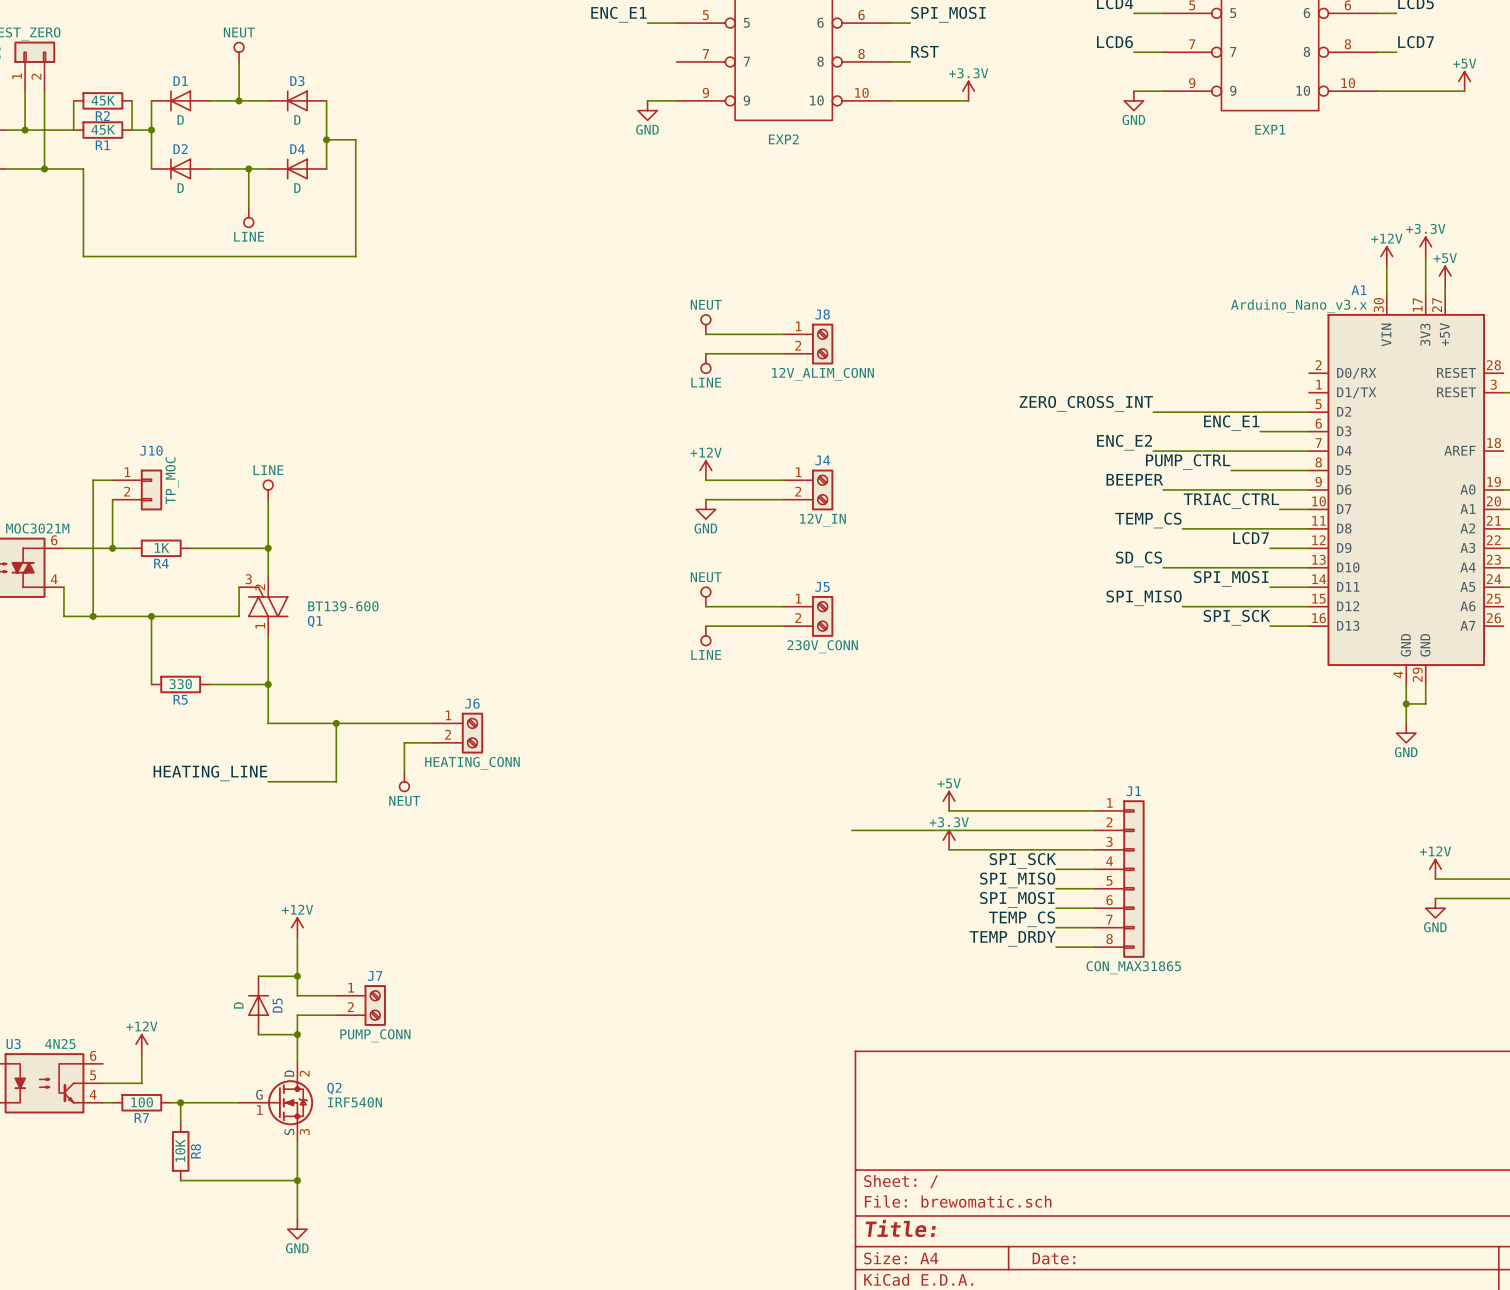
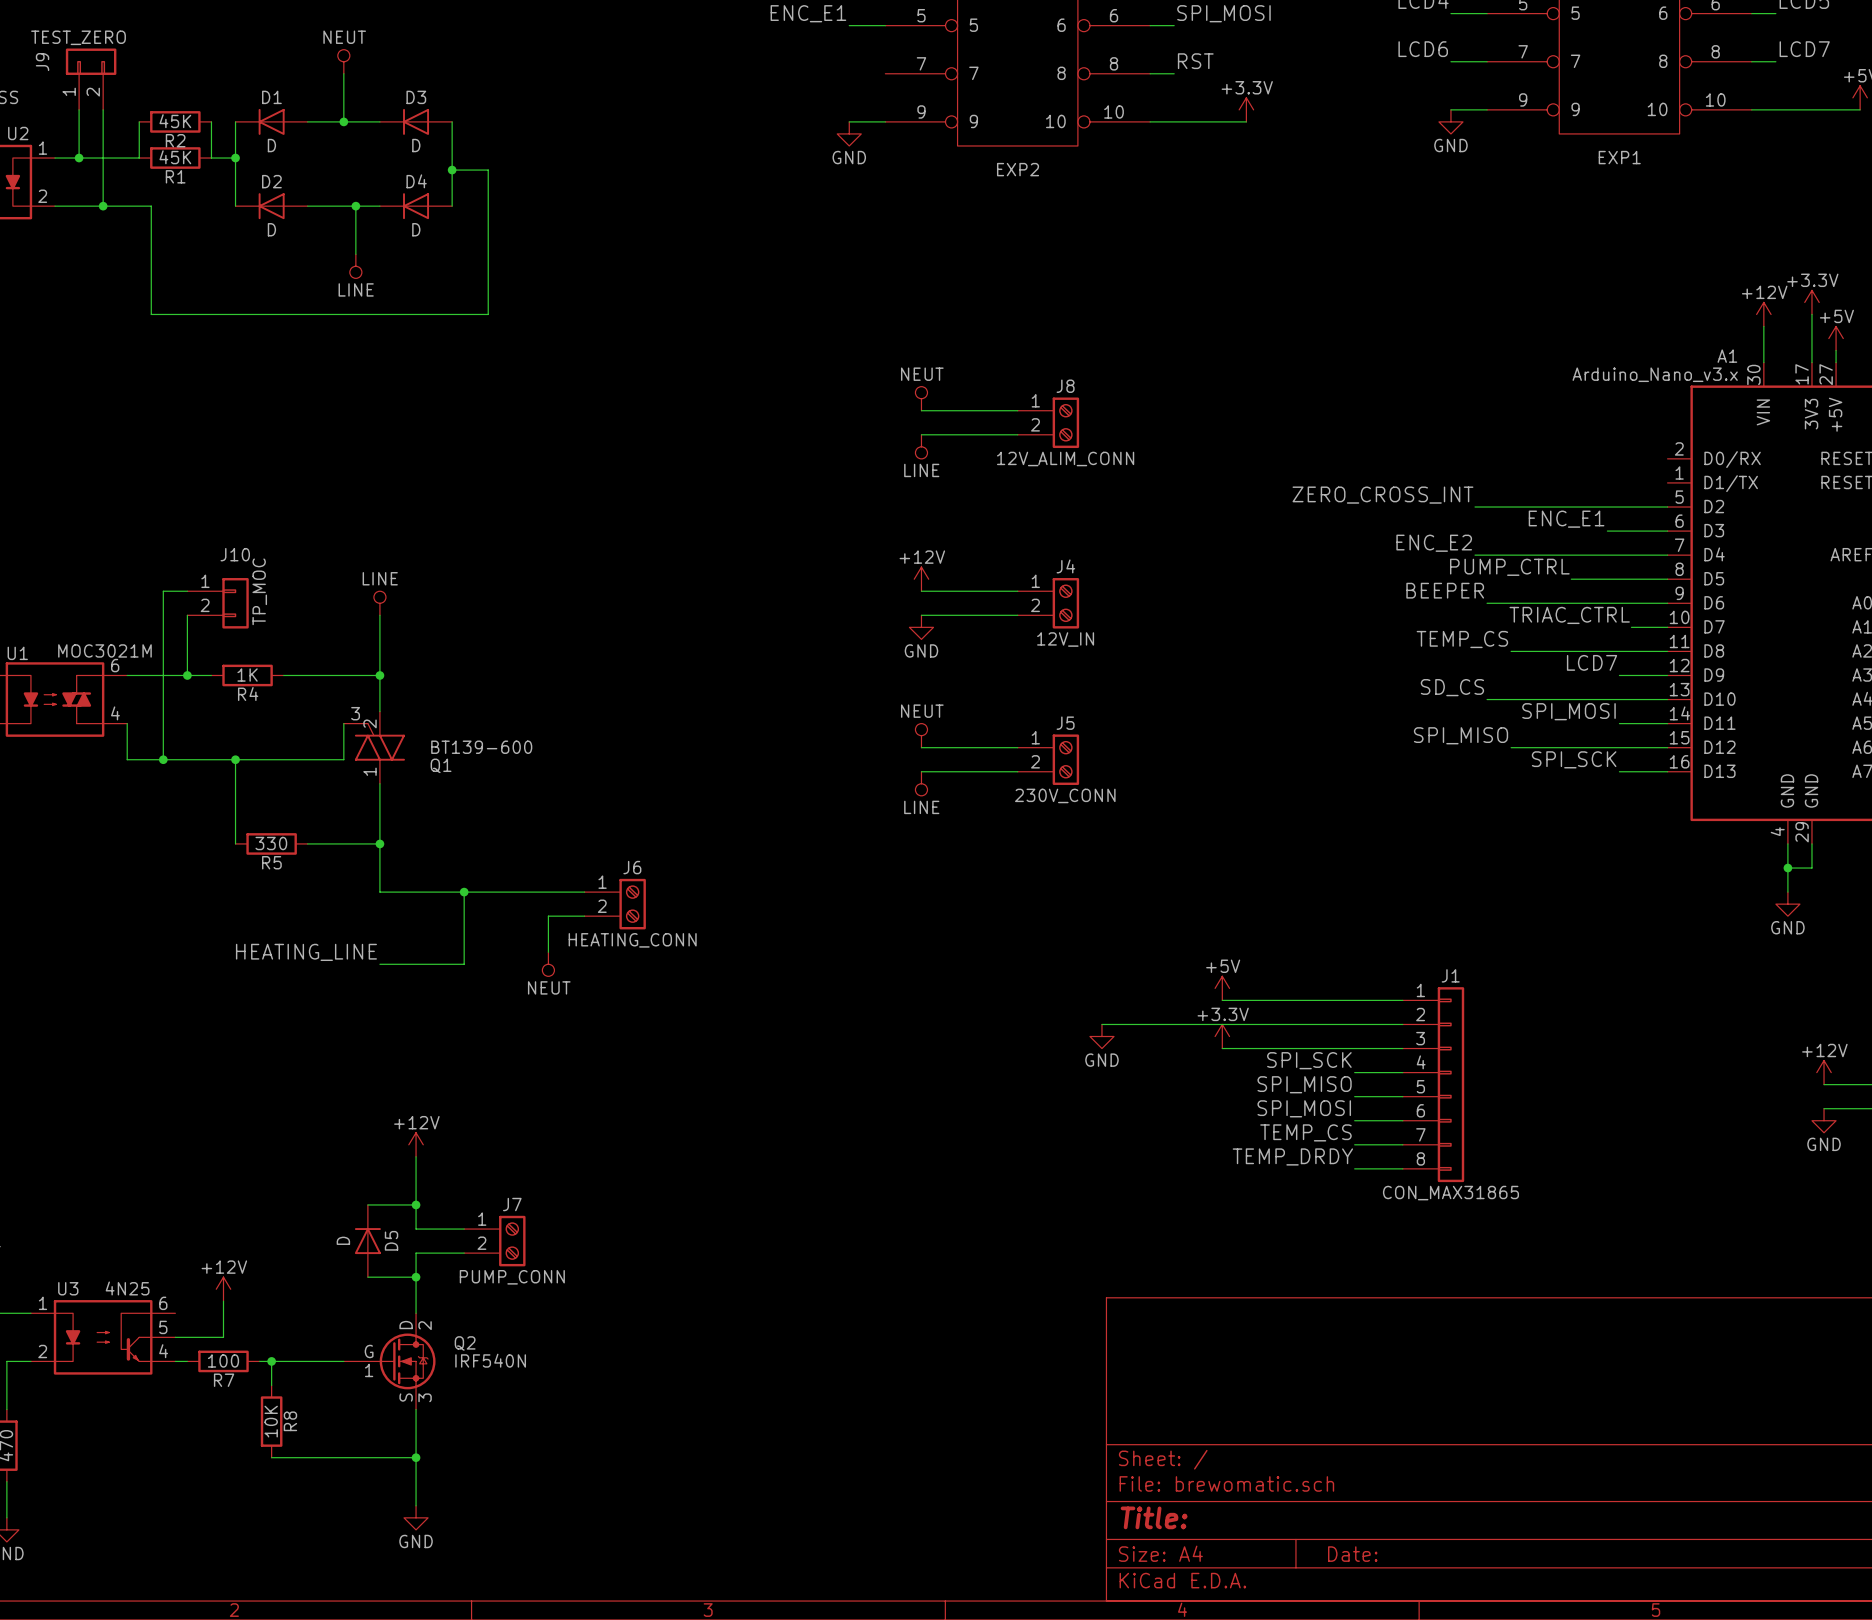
power symbol: none -> GND (1101, 1036)

